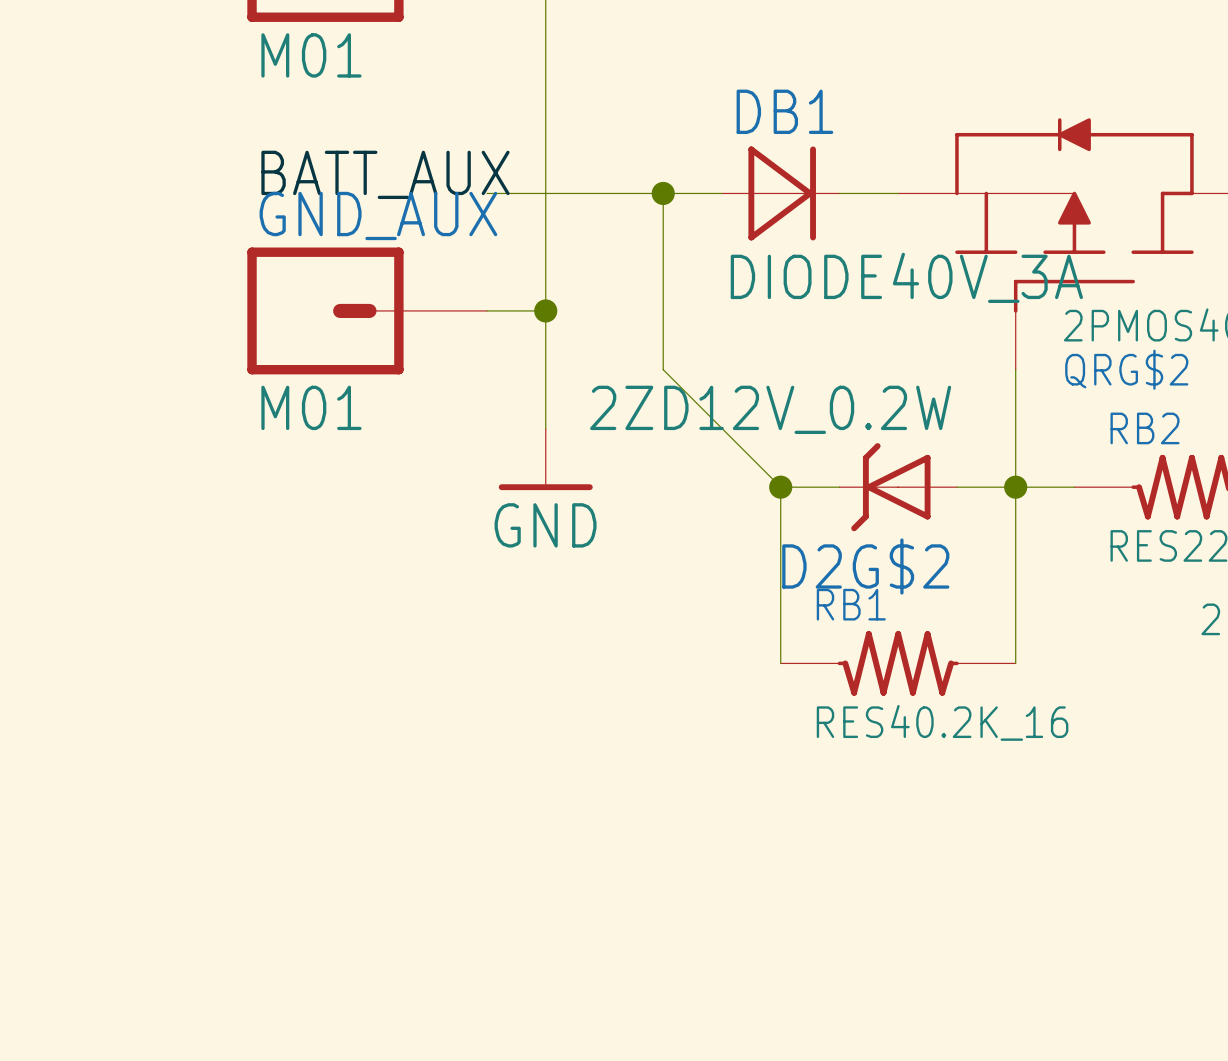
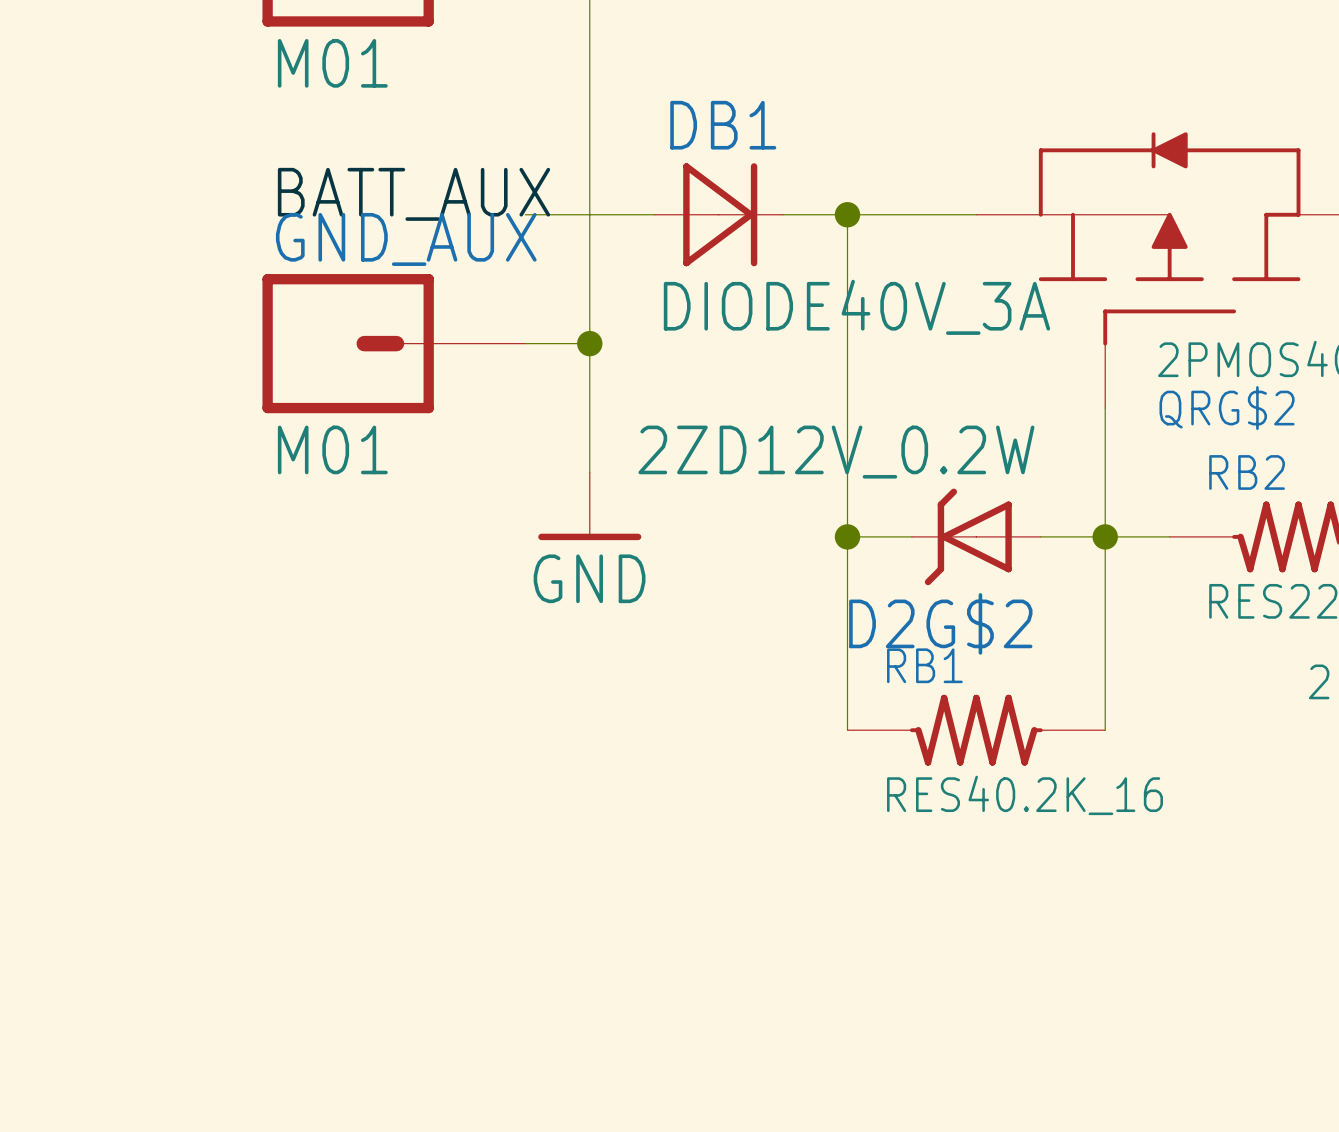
wire: (663, 193) (663, 369) (780, 487) -> (847, 214) (847, 536)
junction position: (663, 193) -> (847, 214)
DB1 position: (780, 193) -> (718, 214)

